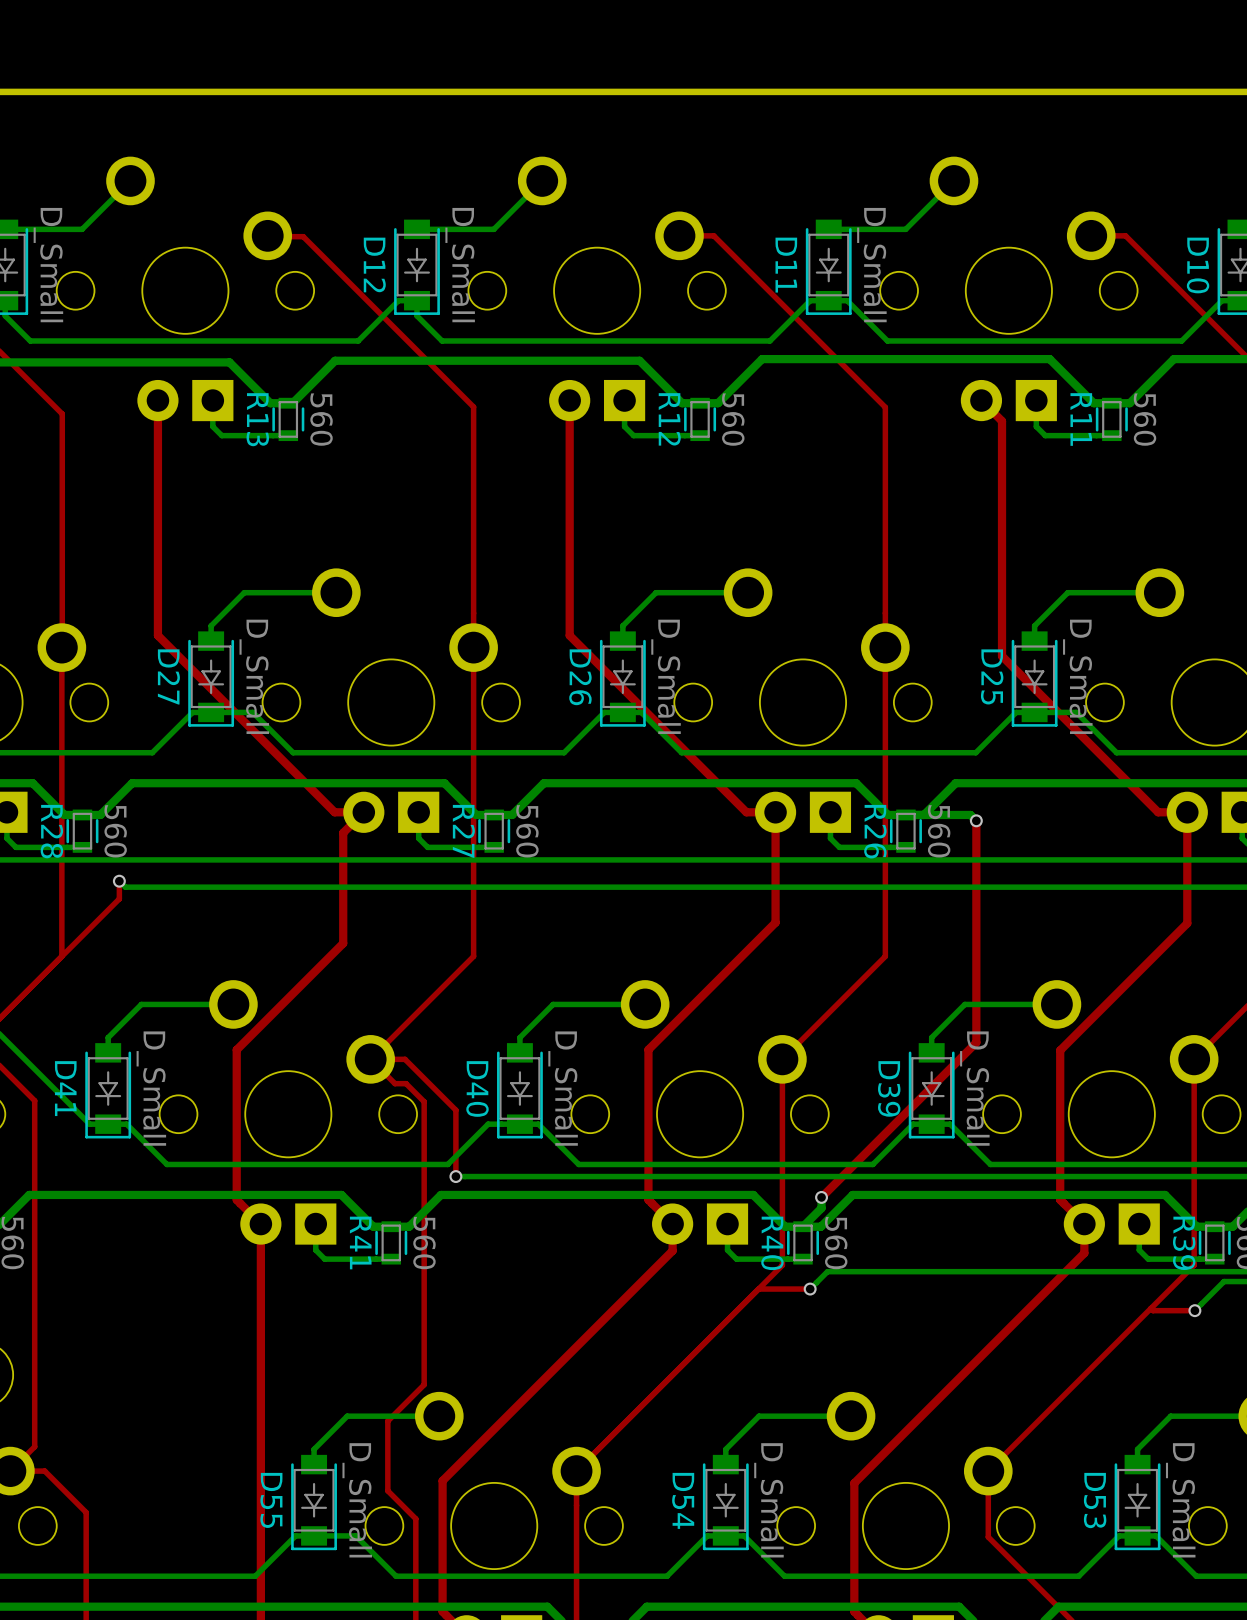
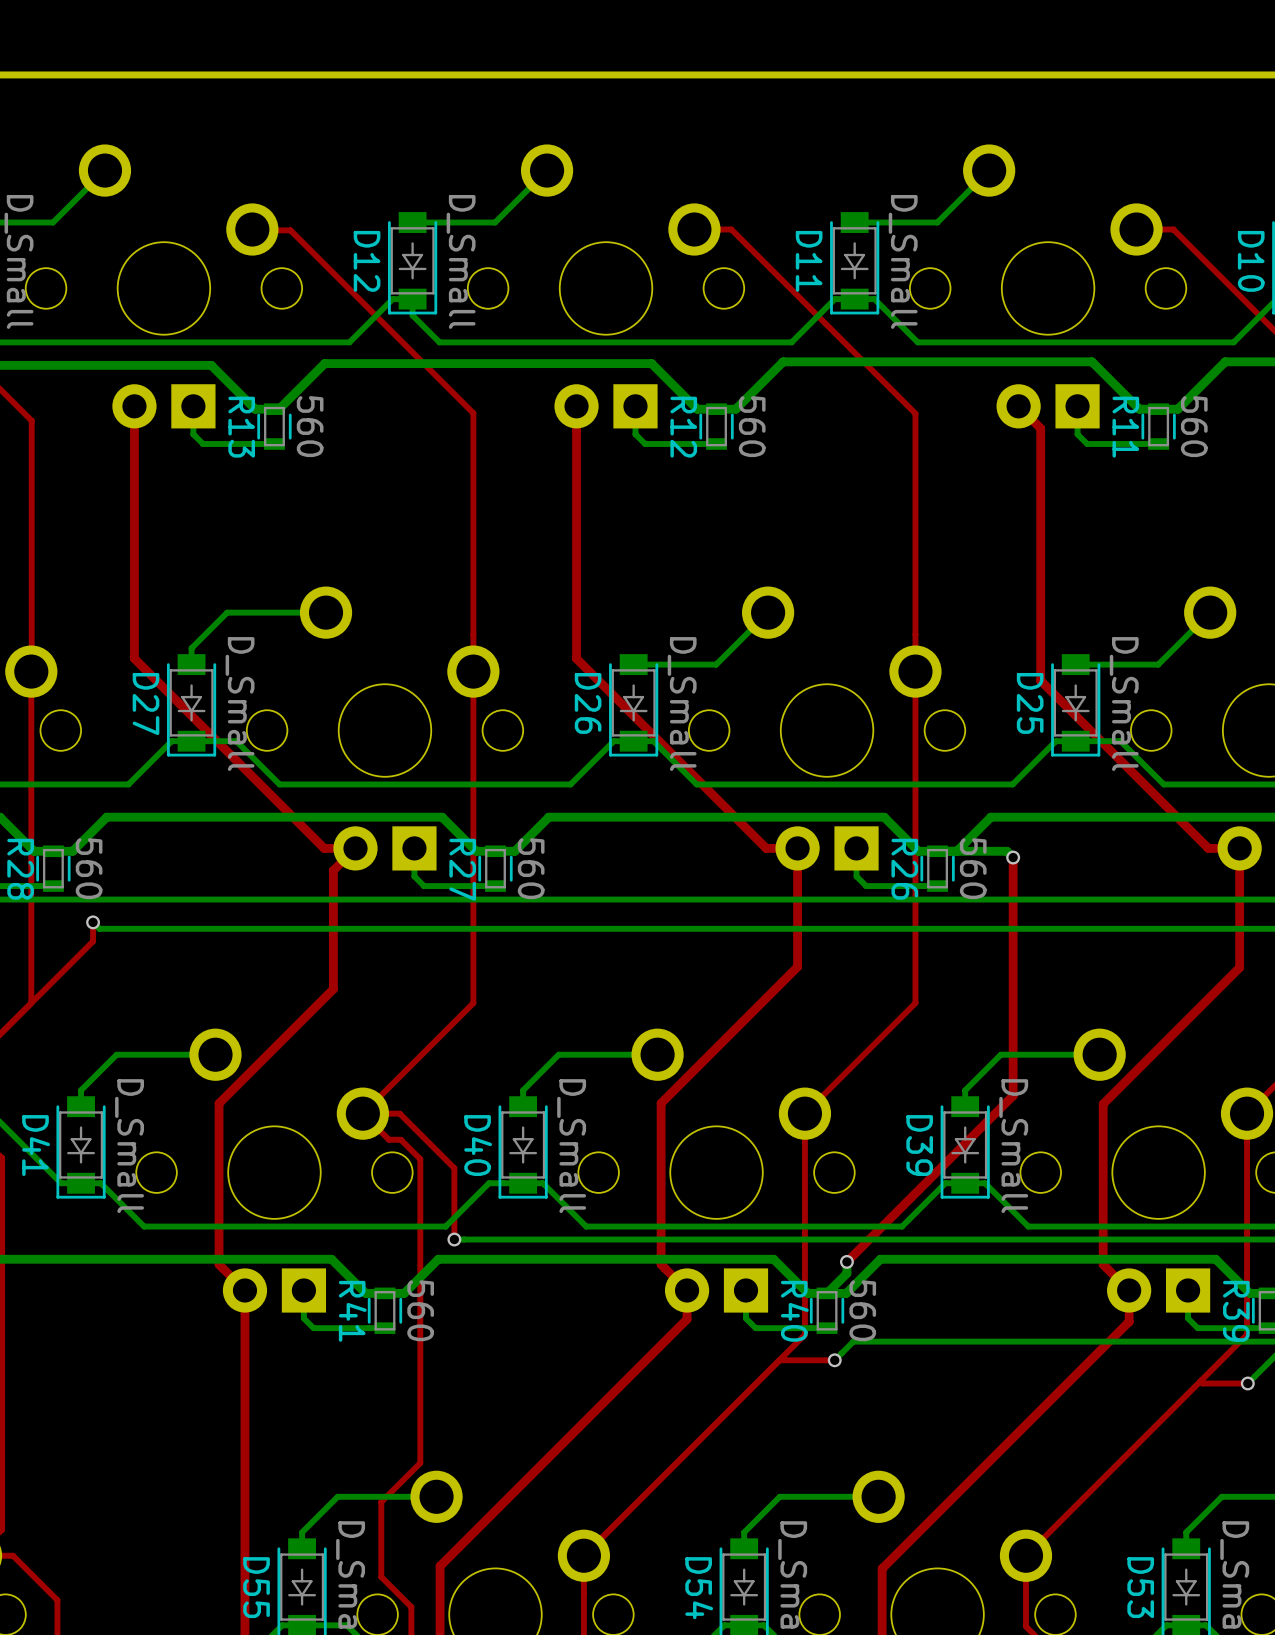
bottom track: (748, 592) (656, 592) (622, 625) (622, 641) -> (767, 613) (716, 664) (633, 664)
bottom track: (1159, 592) (1067, 592) (1034, 625) (1034, 641) -> (1208, 614) (1158, 664) (1075, 664)

